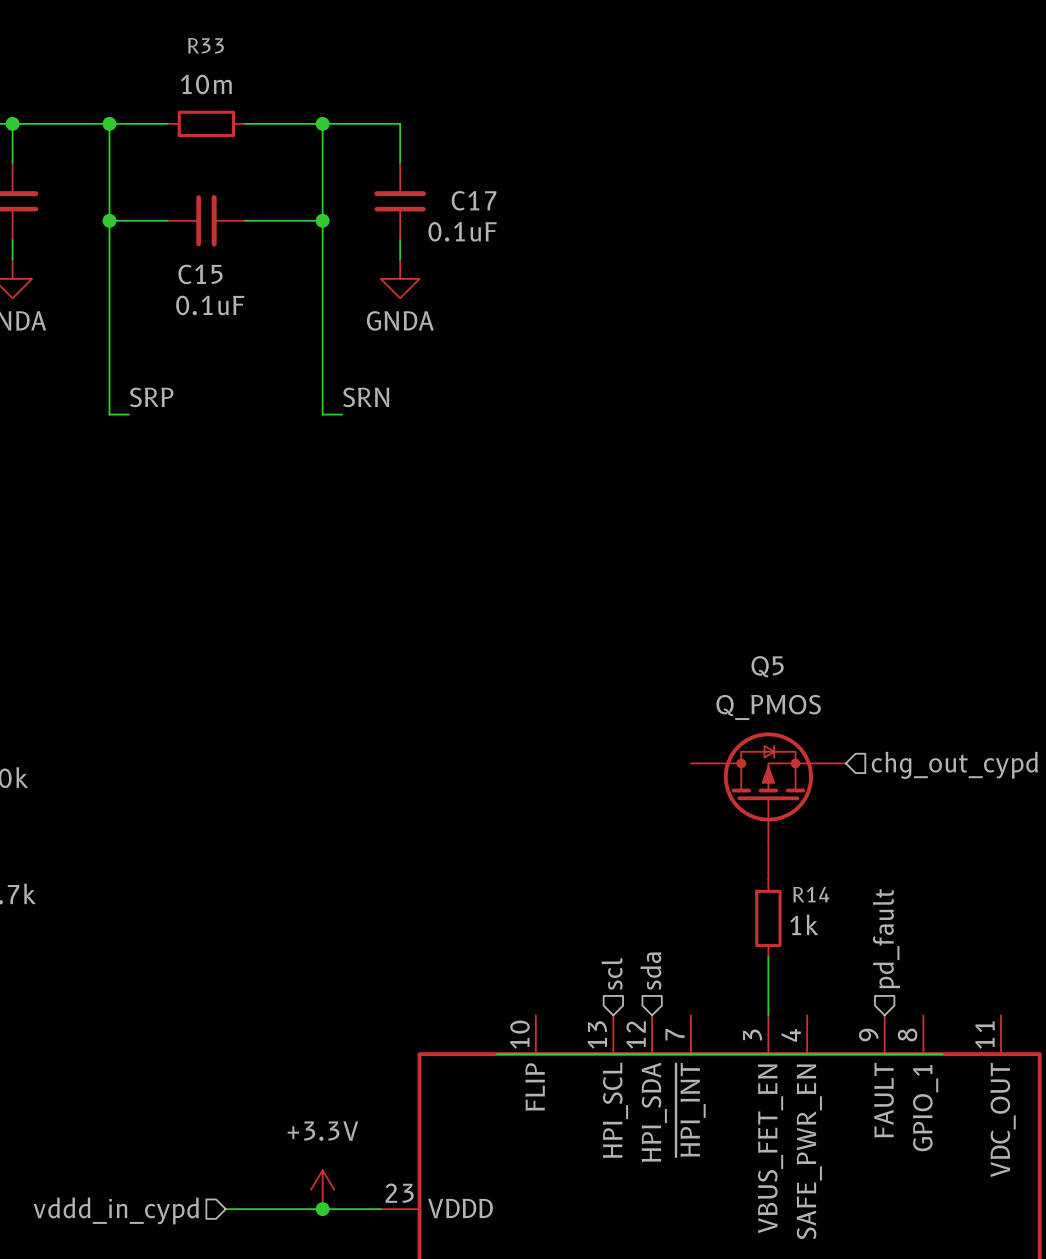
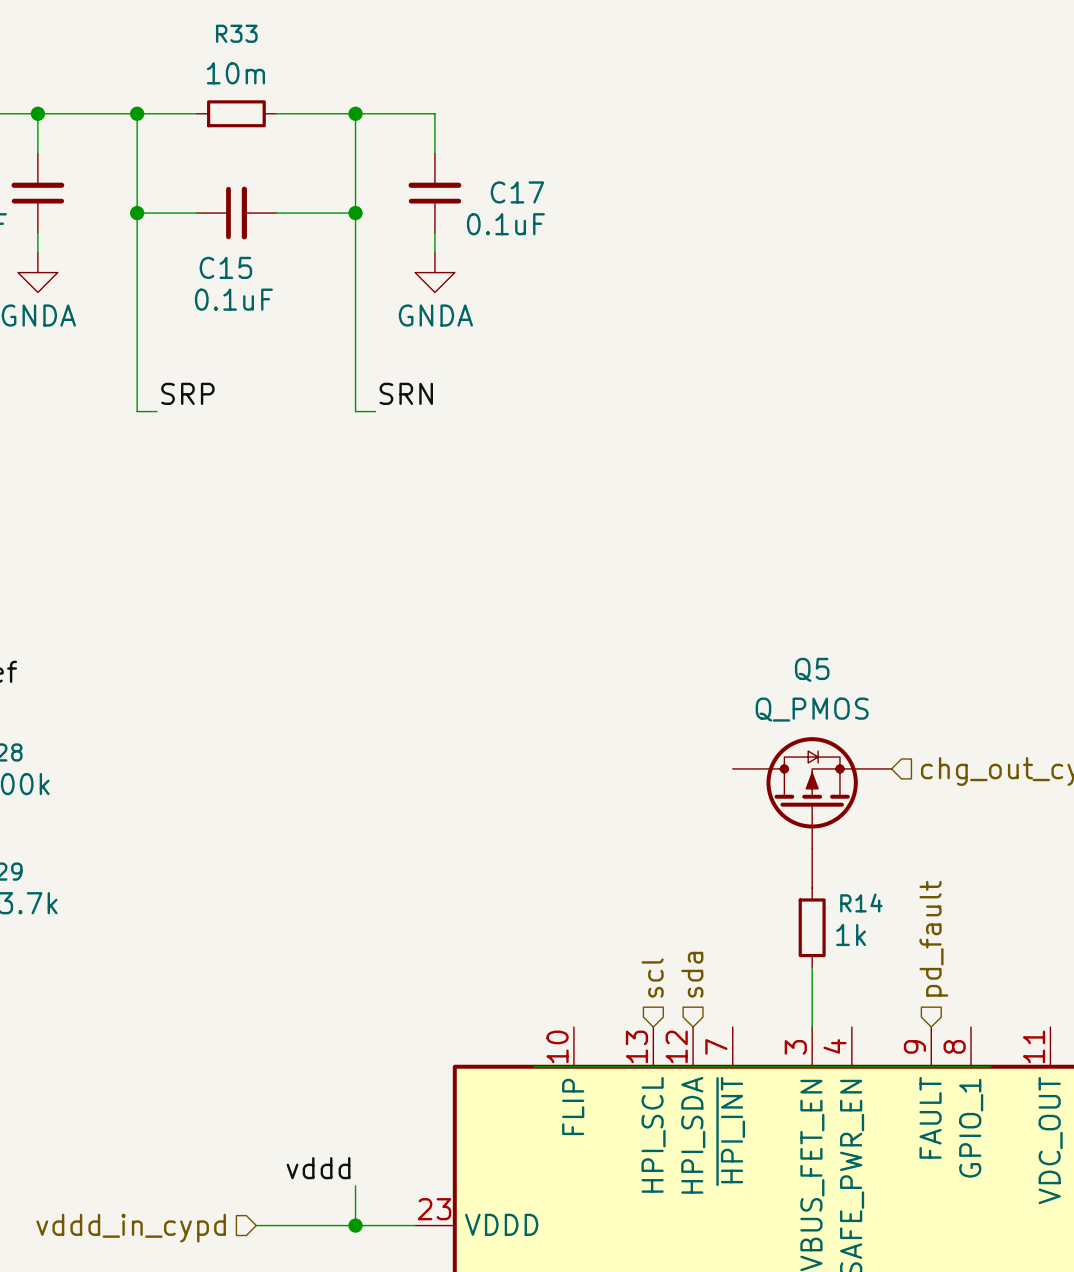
label: none -> vddd (318, 1168)
power symbol: +3.3V (322, 1189) -> none

